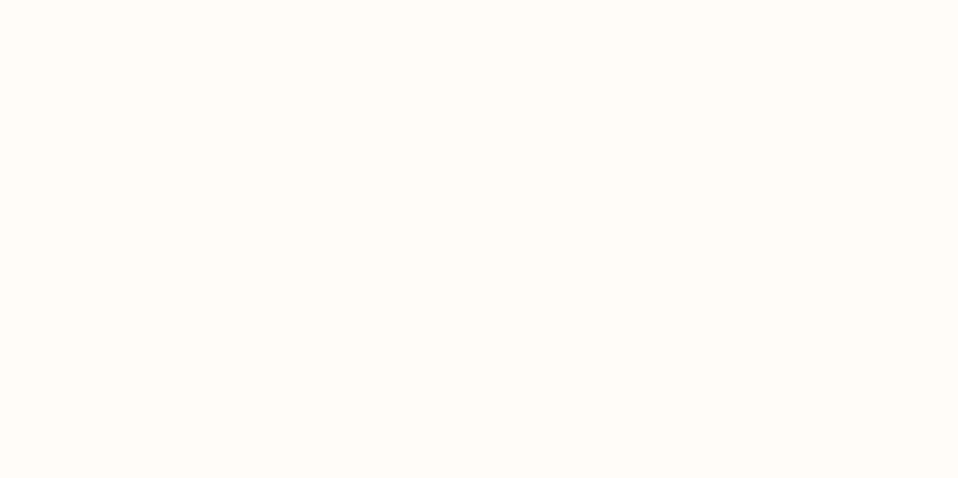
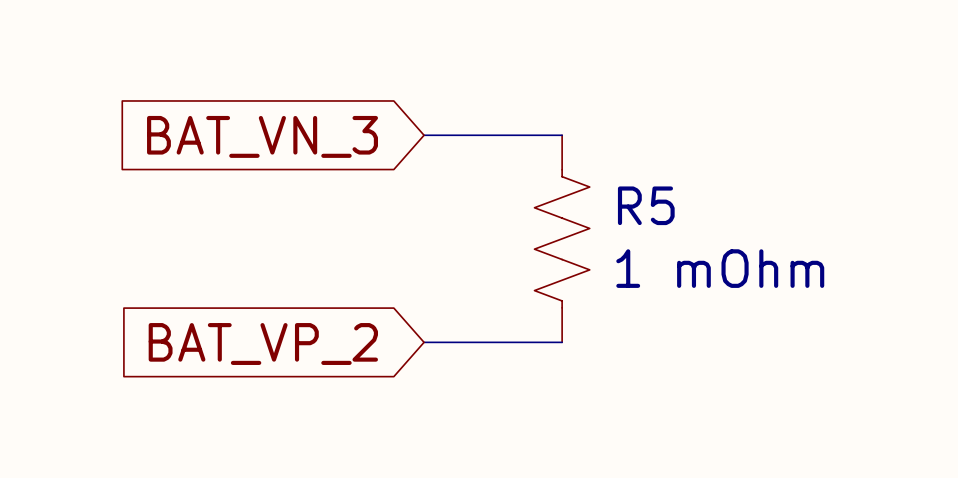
wire: none -> (424, 135) (562, 135)
global label: none -> BAT_VN_3 (262, 136)
R5: none -> 1 mOhm (562, 238)
wire: none -> (424, 342) (562, 342)
global label: none -> BAT_VP_2 (263, 344)

